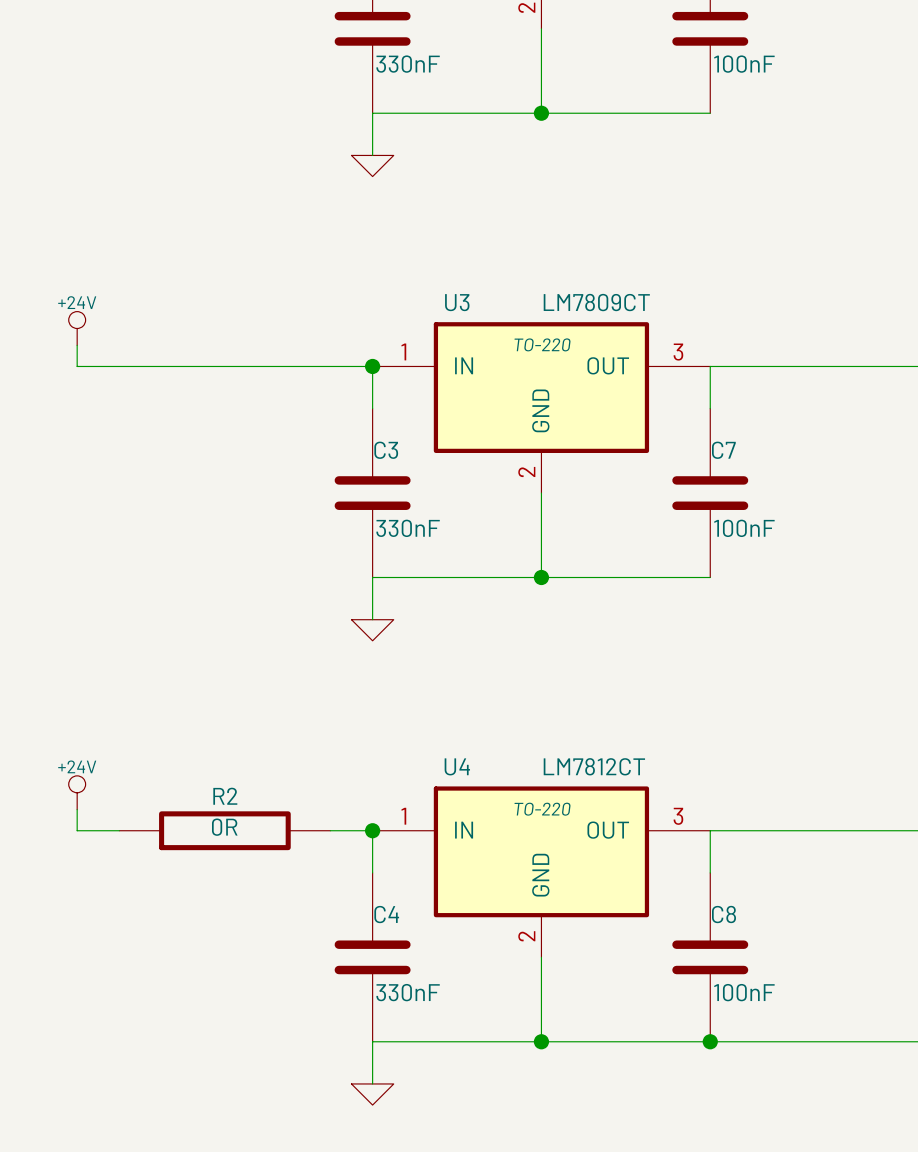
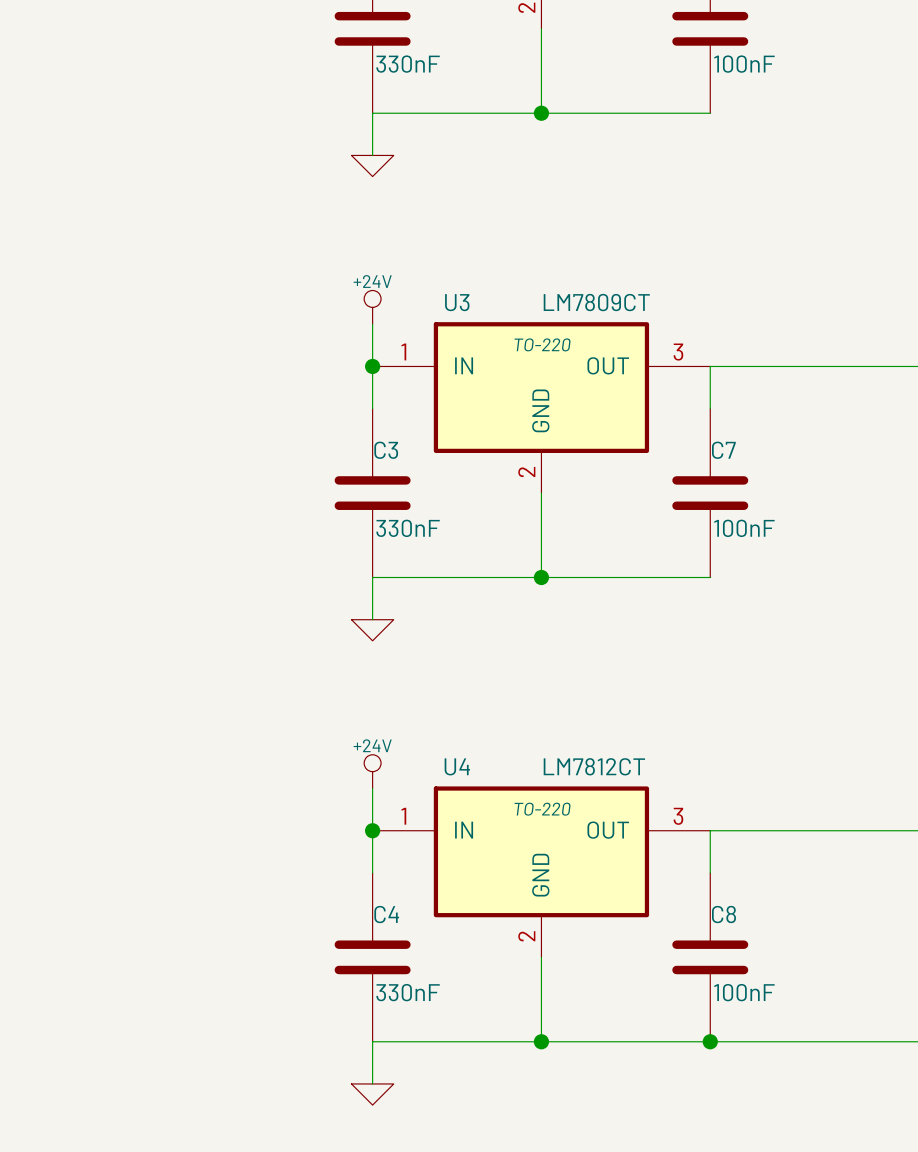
power symbol: none -> +24V (372, 307)
power symbol: +24V (77, 328) -> none
wire: (77, 345) (77, 366) (372, 366) -> (372, 324) (372, 366)
power symbol: none -> +24V (372, 771)
power symbol: +24V (77, 792) -> none
wire: (77, 809) (77, 830) (119, 830) -> none
R2: 0R (224, 830) -> none
wire: (330, 830) (372, 830) -> (372, 788) (372, 830)

